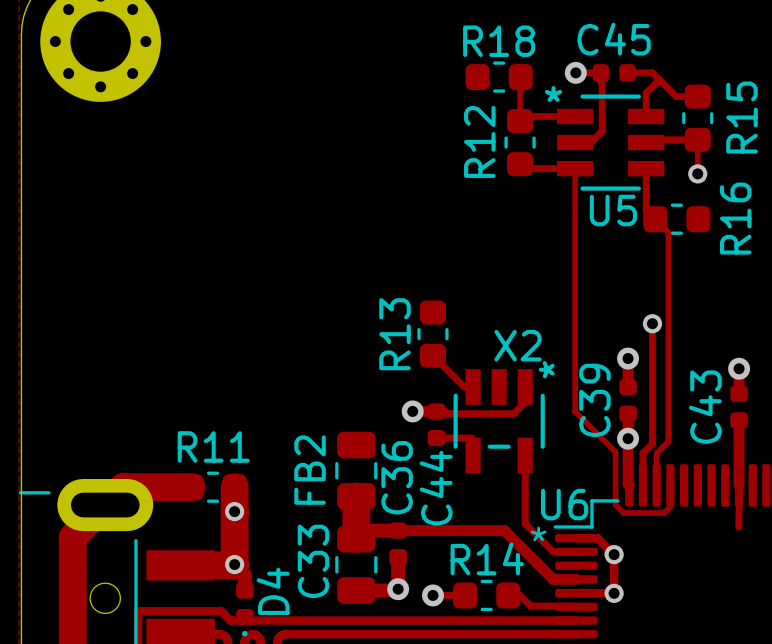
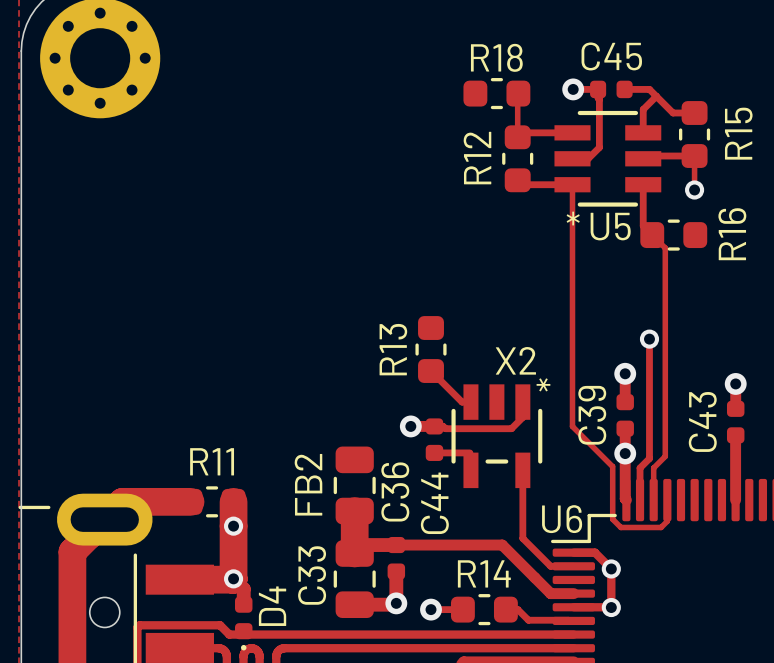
U5 text position: * (553, 93) -> * (573, 218)
track: (739, 479) (738, 527) -> none
U6 text: * (538, 533) -> none

